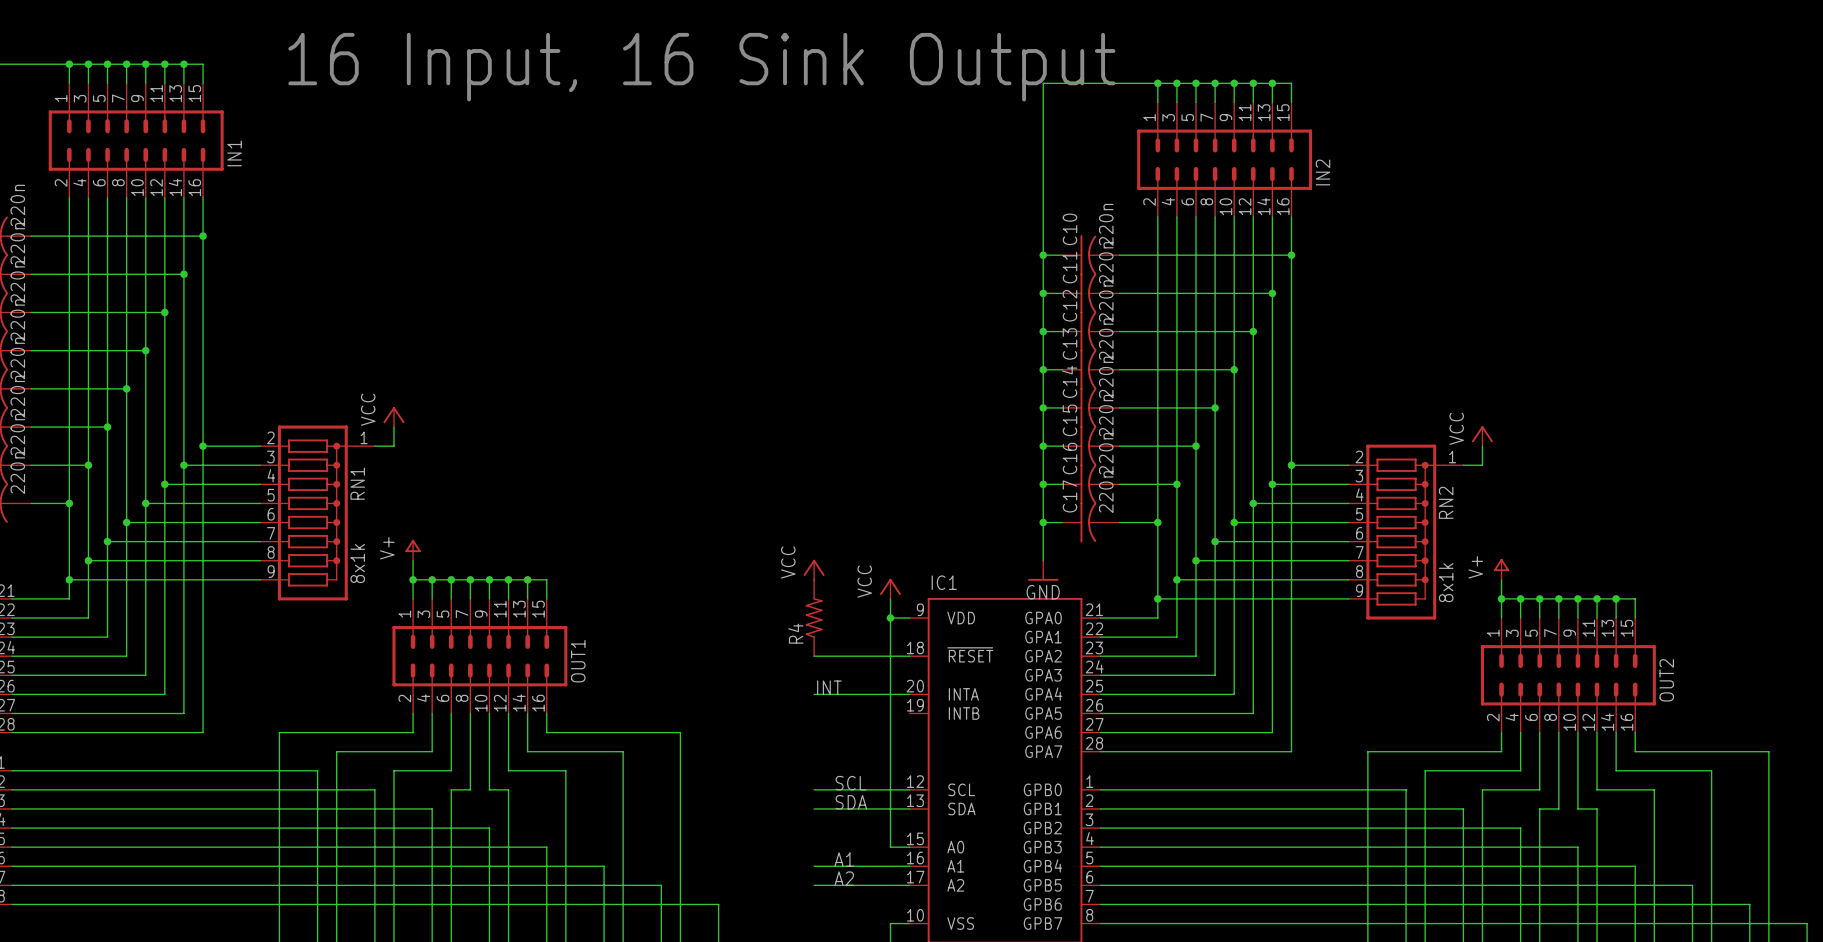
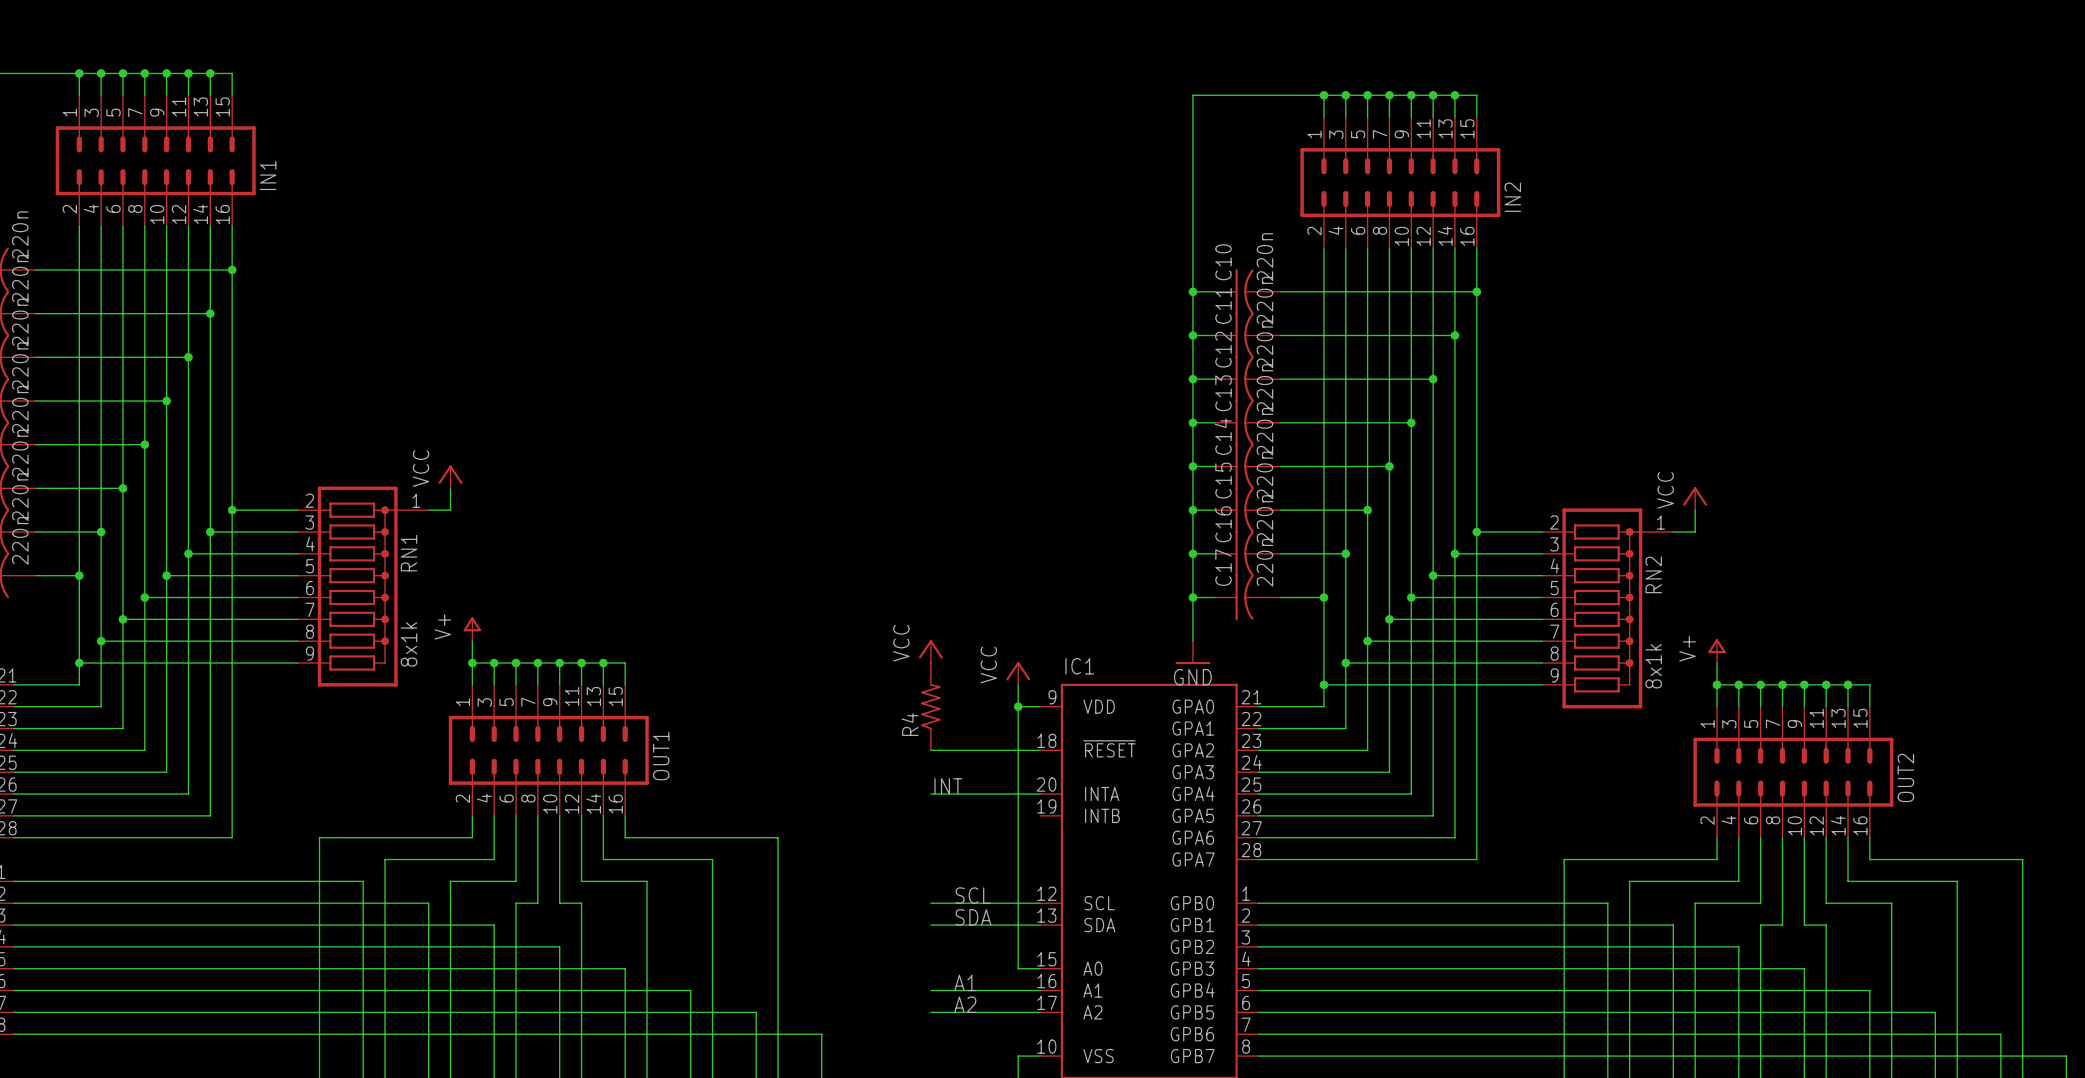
text: 16 Input, 16 Sink Output (701, 67) -> none

